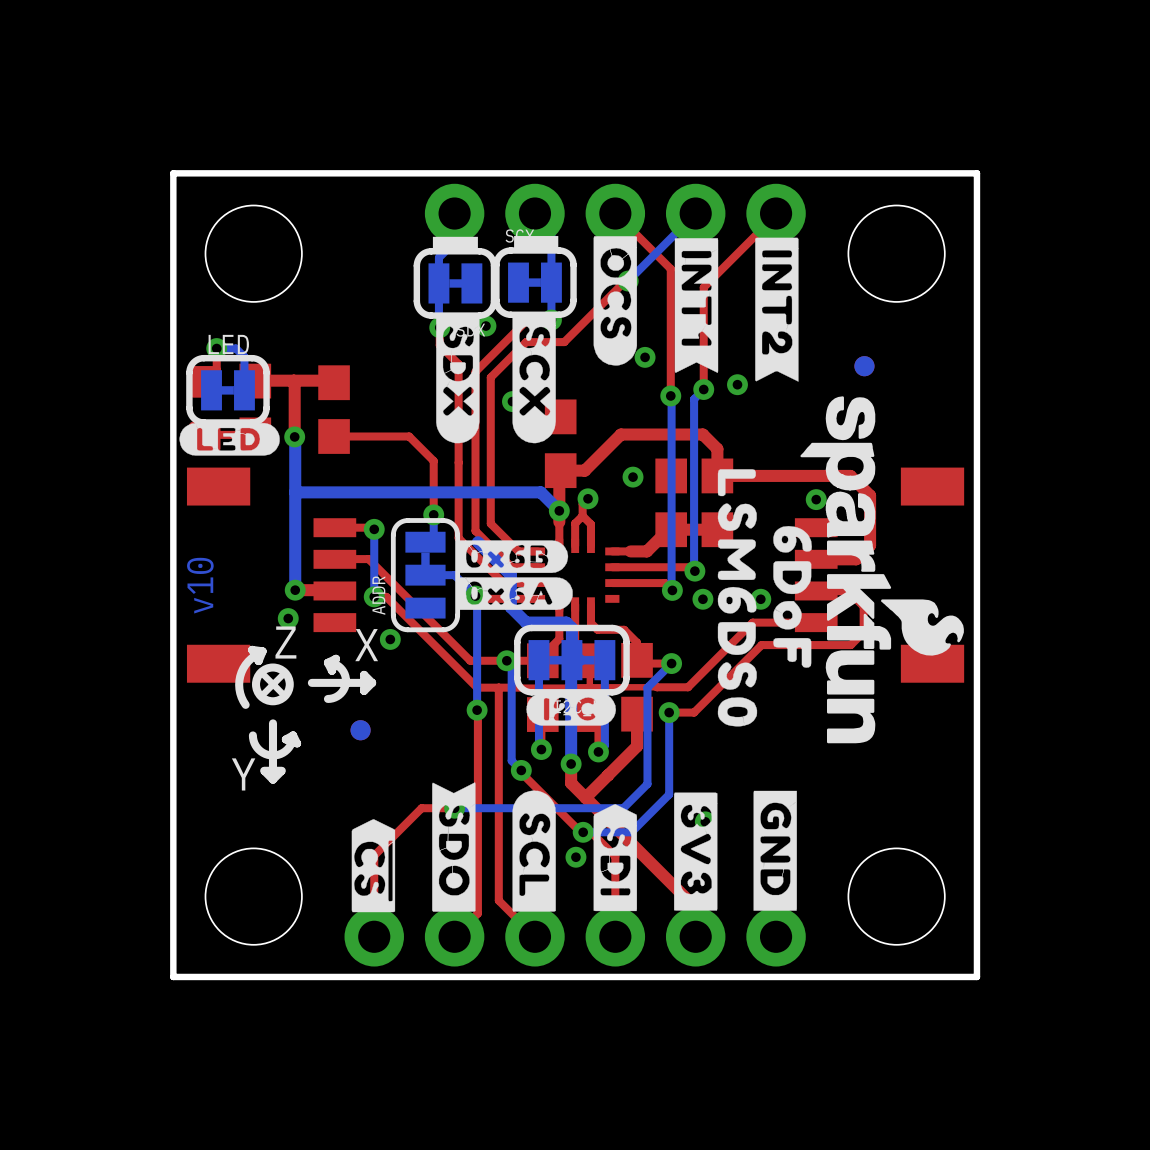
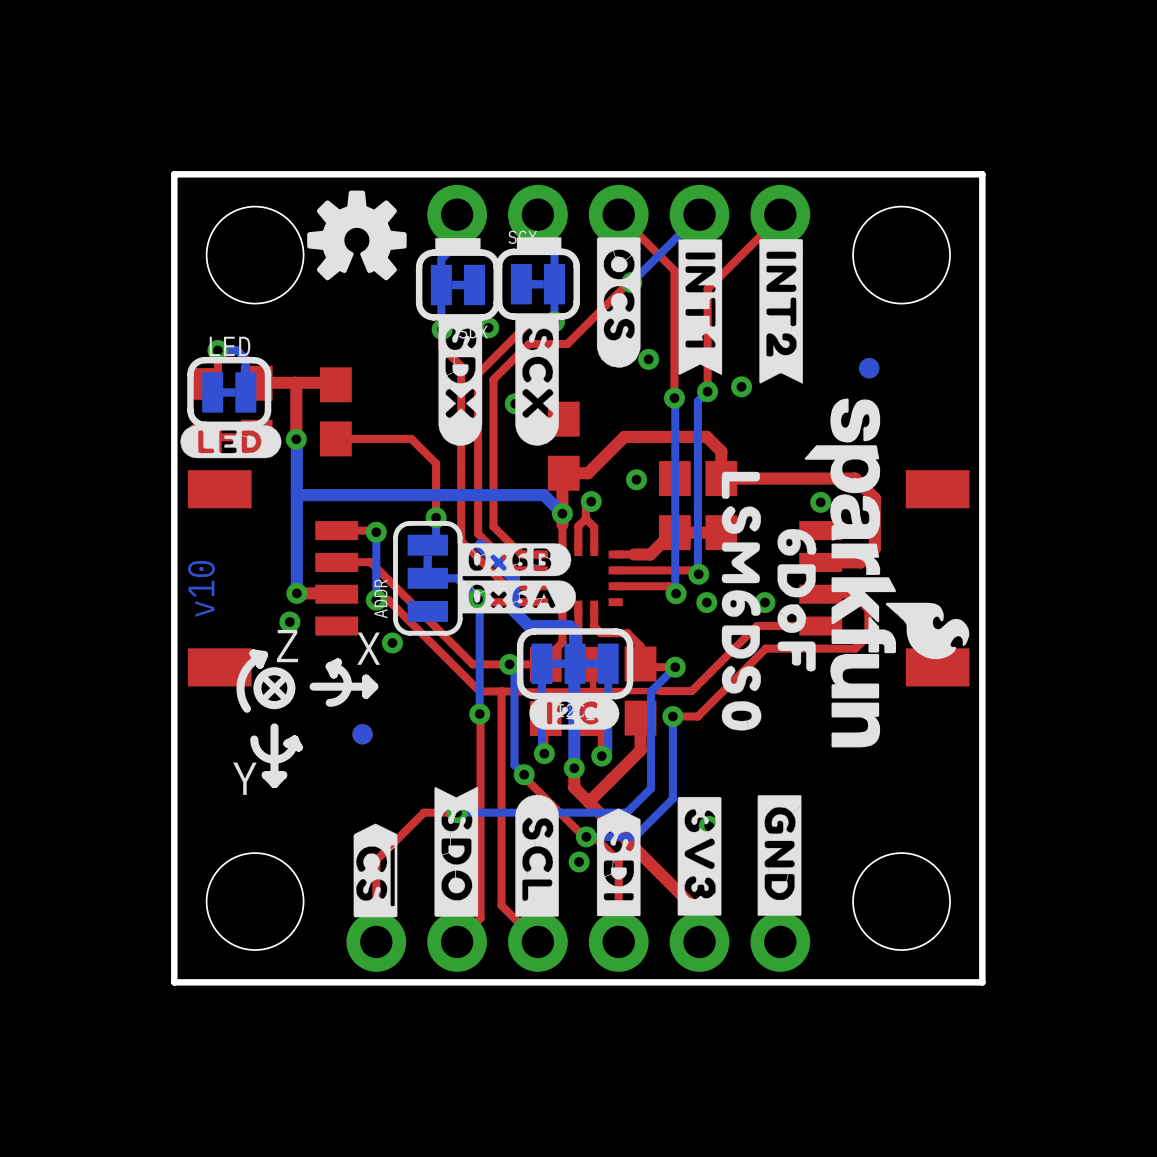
drawing: none -> [307, 190, 407, 281]

